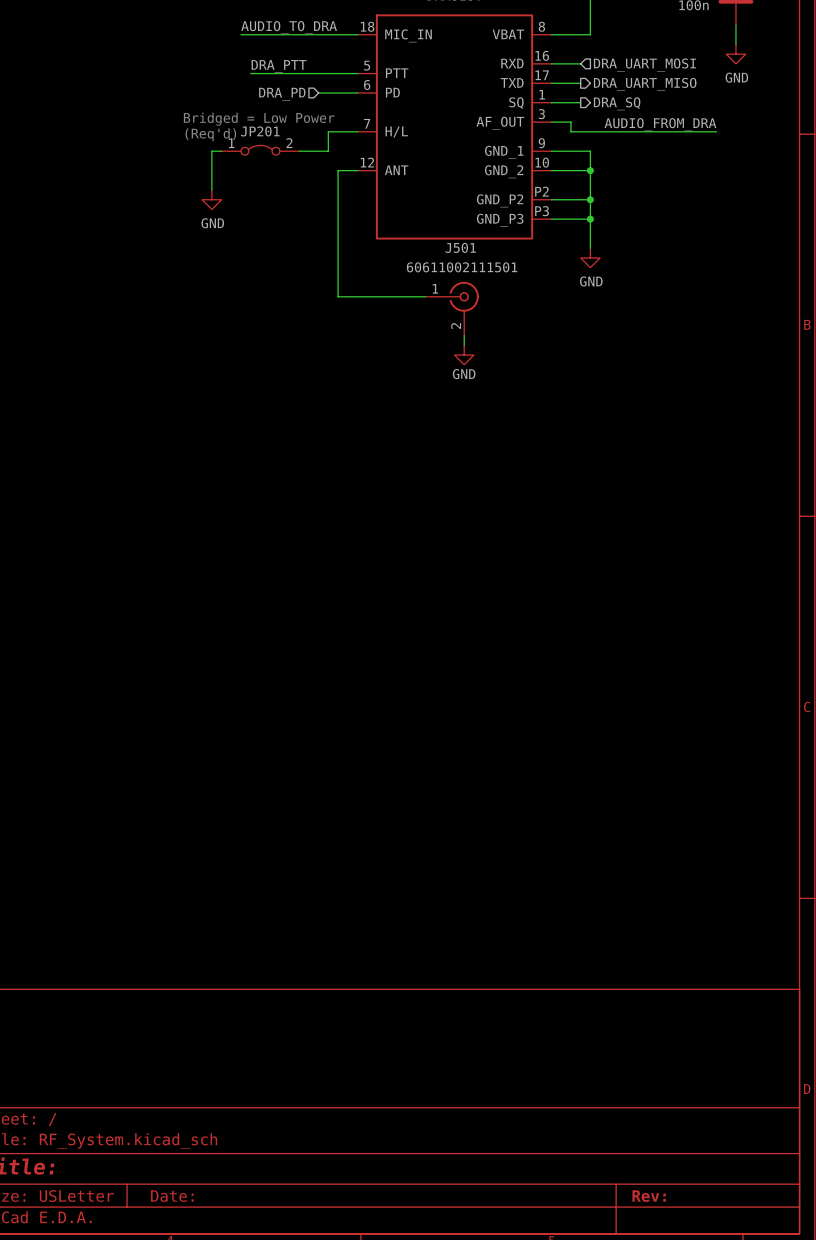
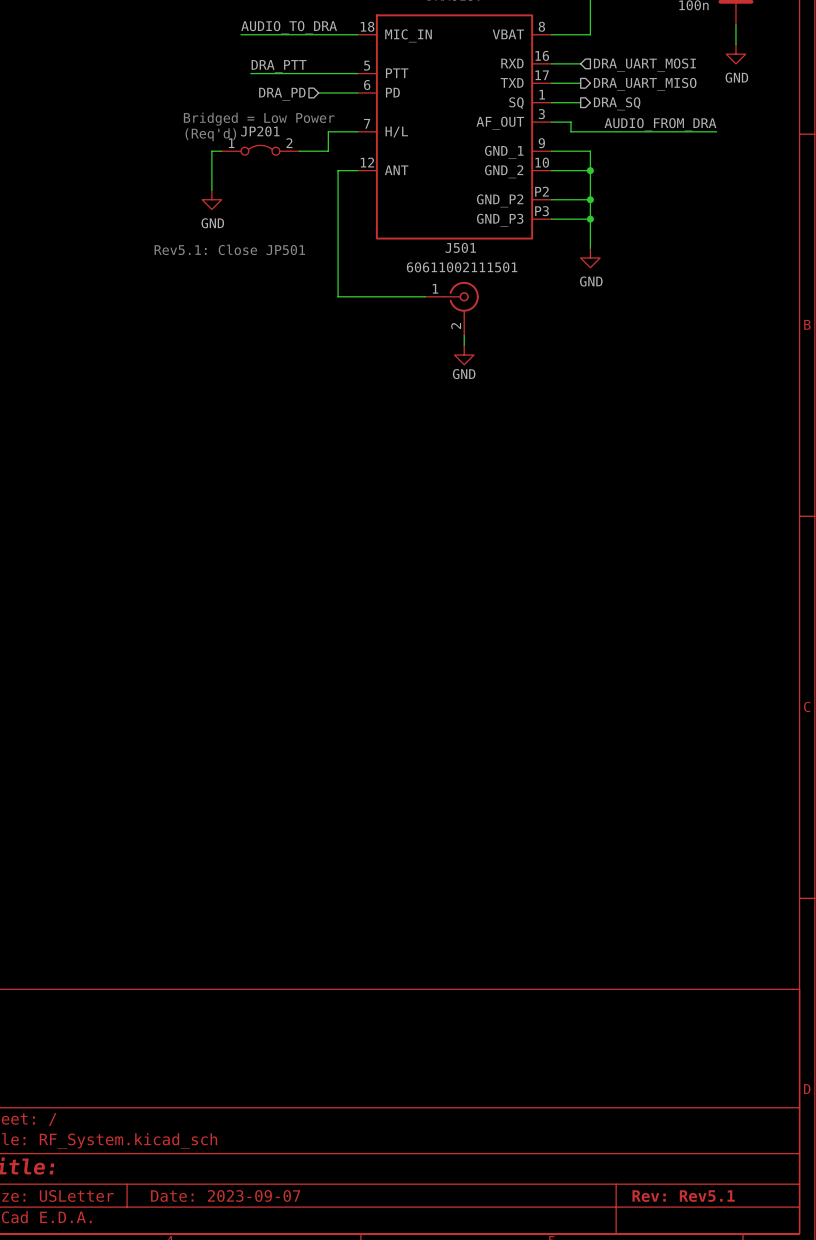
text: none -> Rev5.1: Close JP501 (229, 249)
title block: Date: (172, 1196) -> Date: 2023-09-07 (225, 1195)
title block: Rev: (649, 1196) -> Rev: Rev5.1 (683, 1196)

